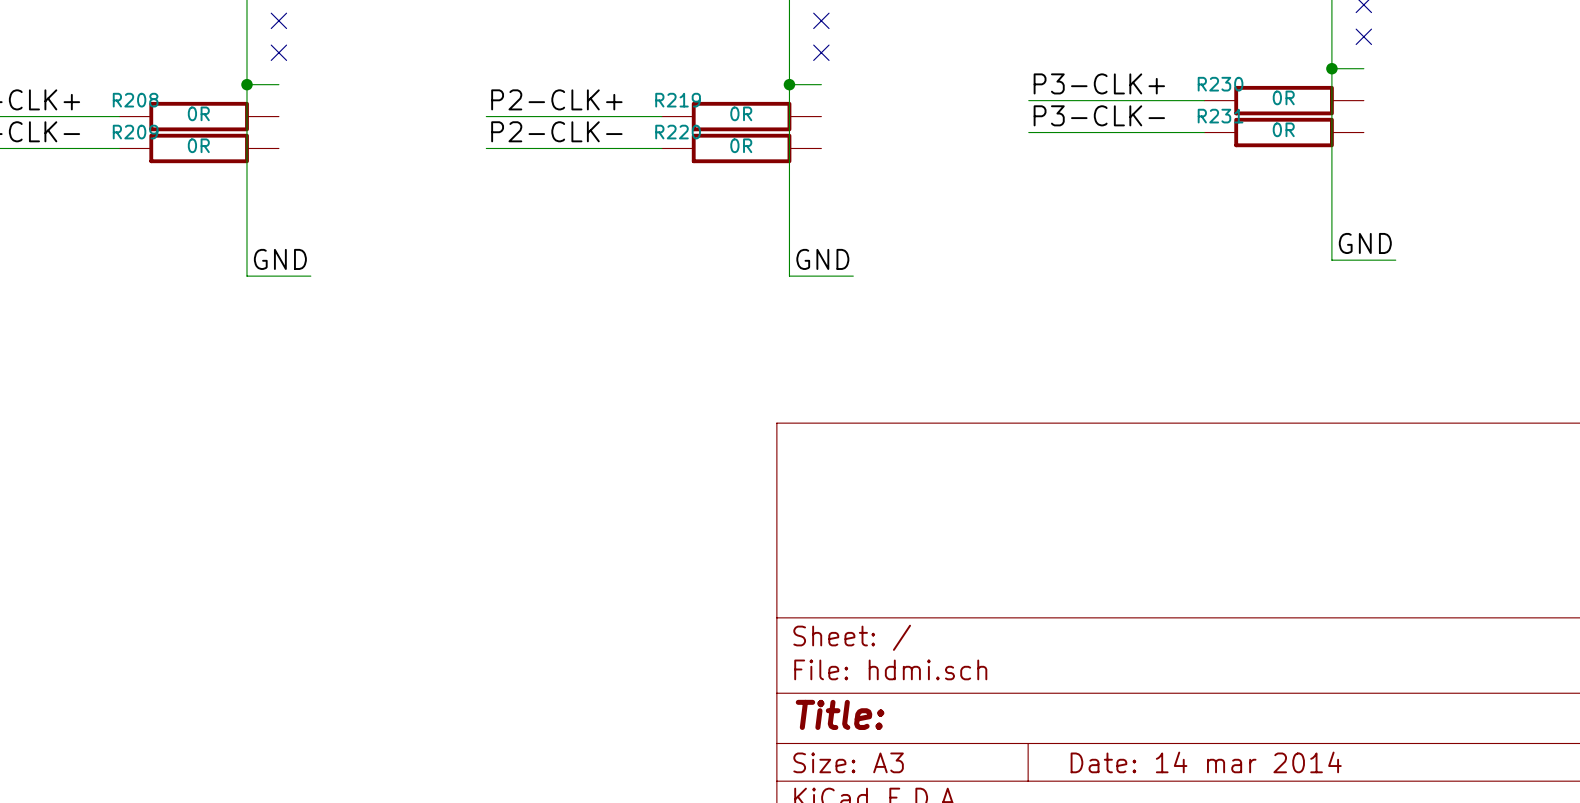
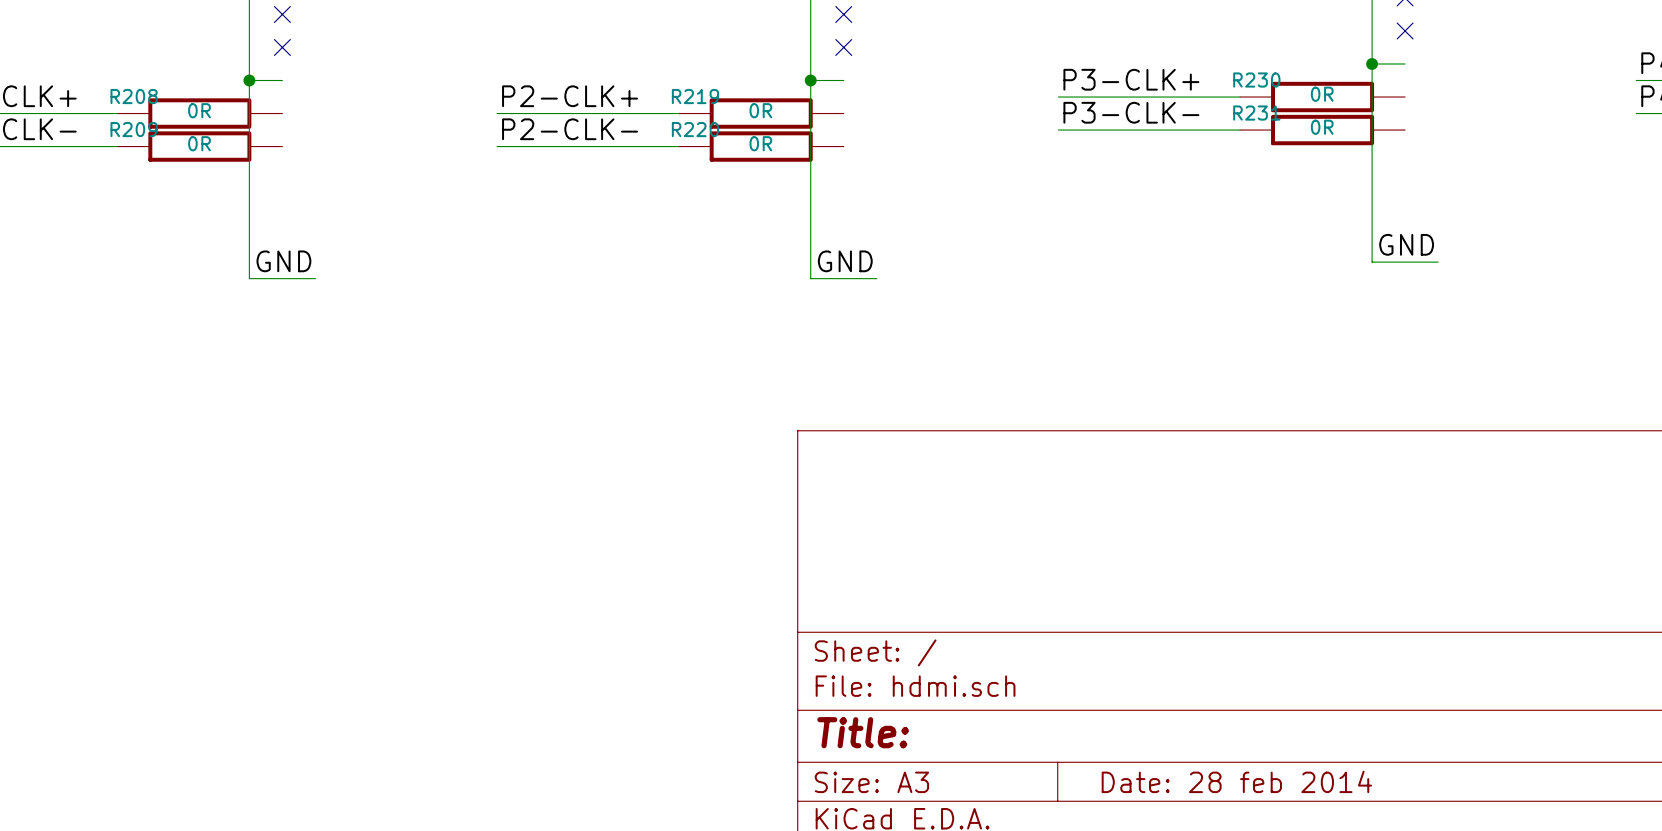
title block: Date: 14 mar 2014 (1206, 762) -> Date: 28 feb 2014 (1236, 781)

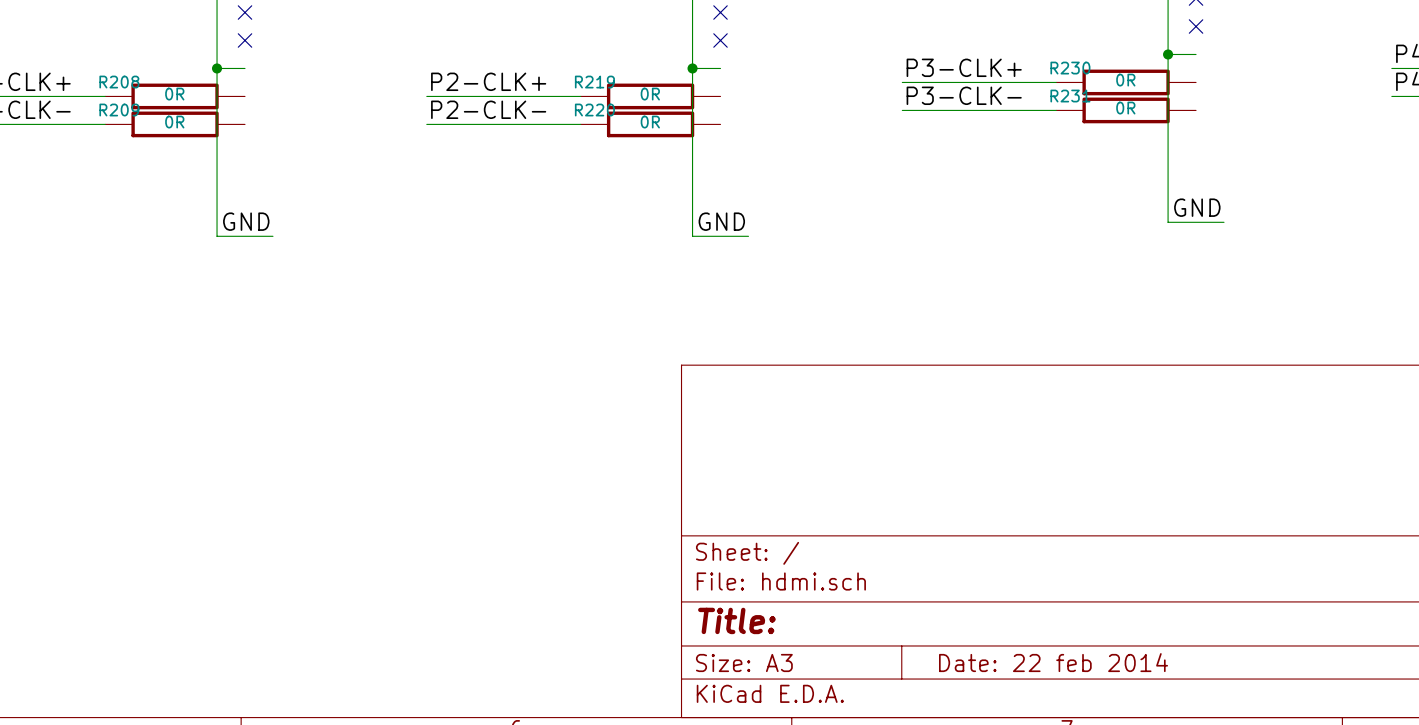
title block: Date: 28 feb 2014 (1236, 781) -> Date: 22 feb 2014 (1053, 662)

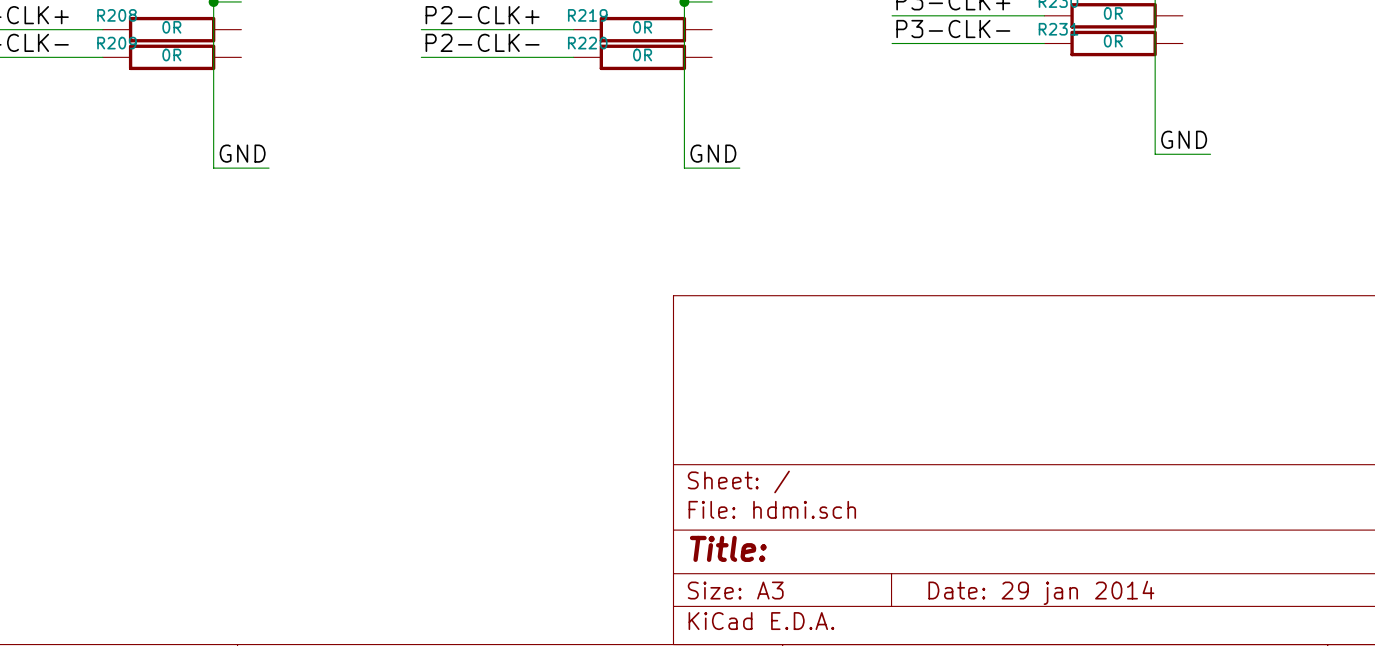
title block: Date: 22 feb 2014 (1053, 662) -> Date: 29 jan 2014 (1041, 592)

